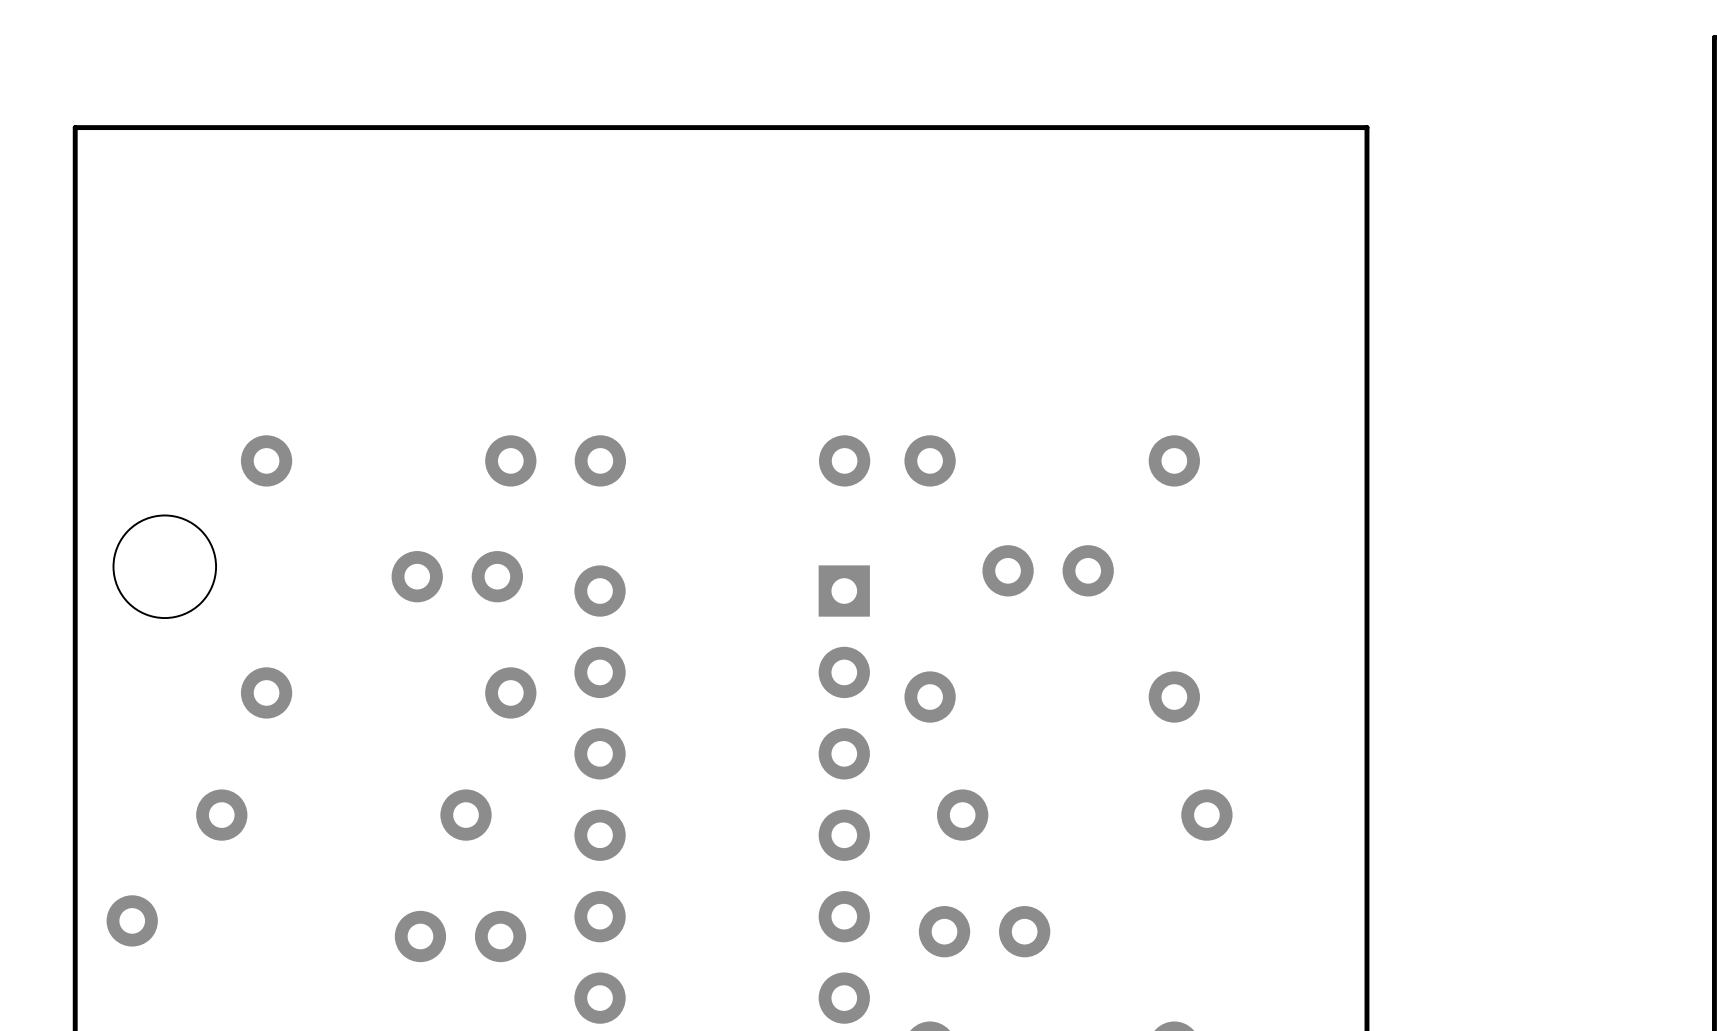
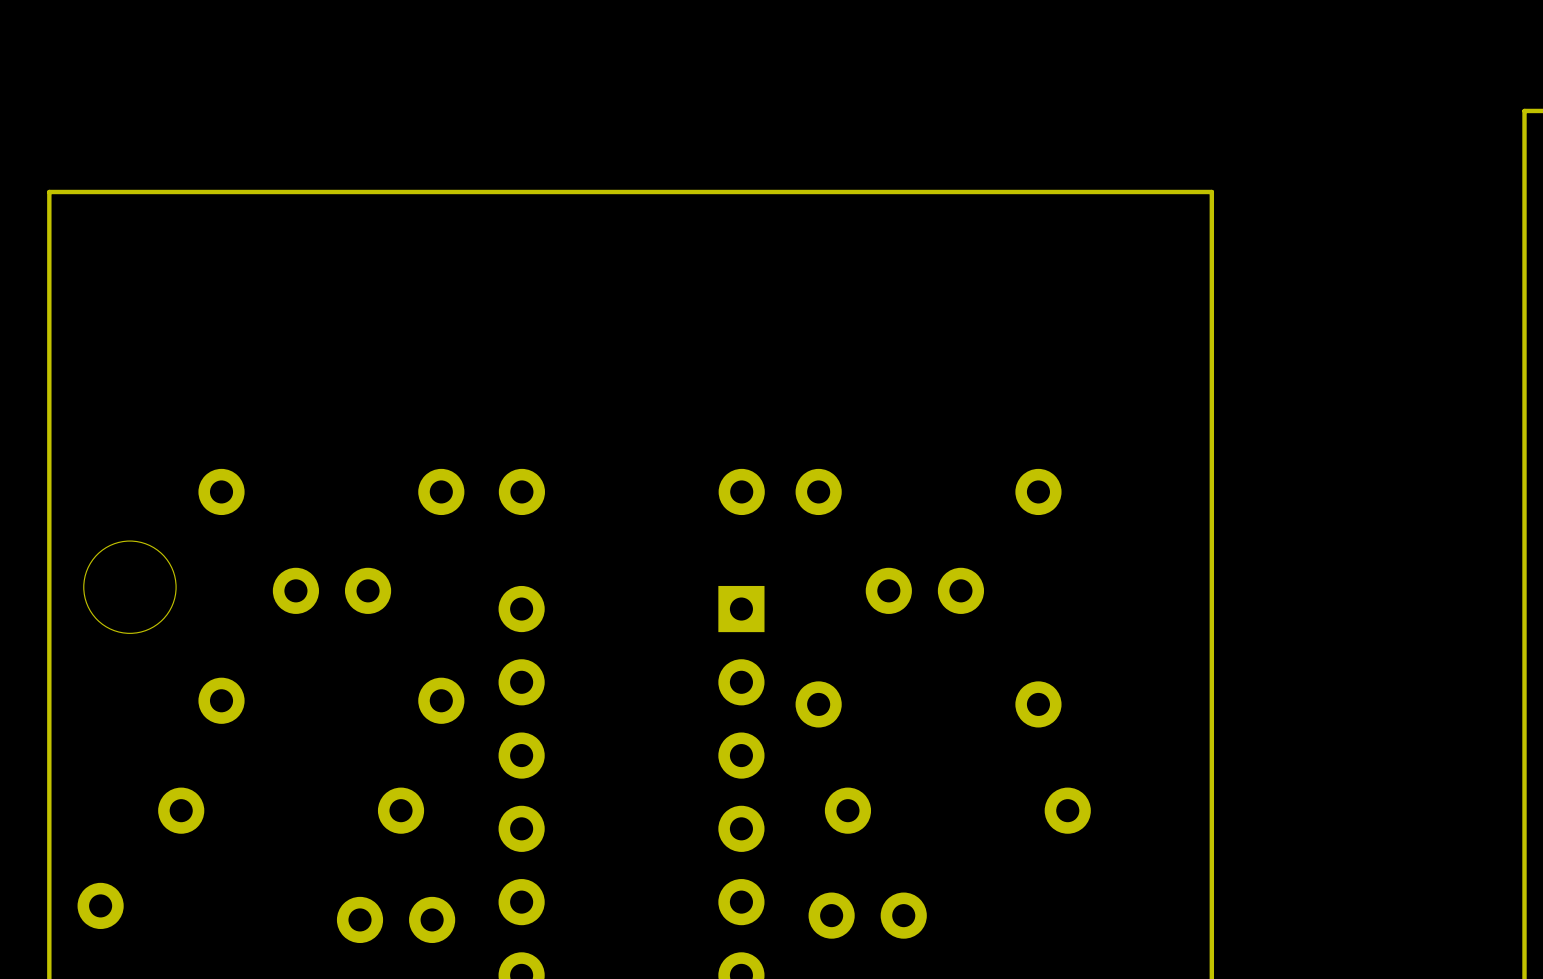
part position: (457, 576) -> (331, 590)

